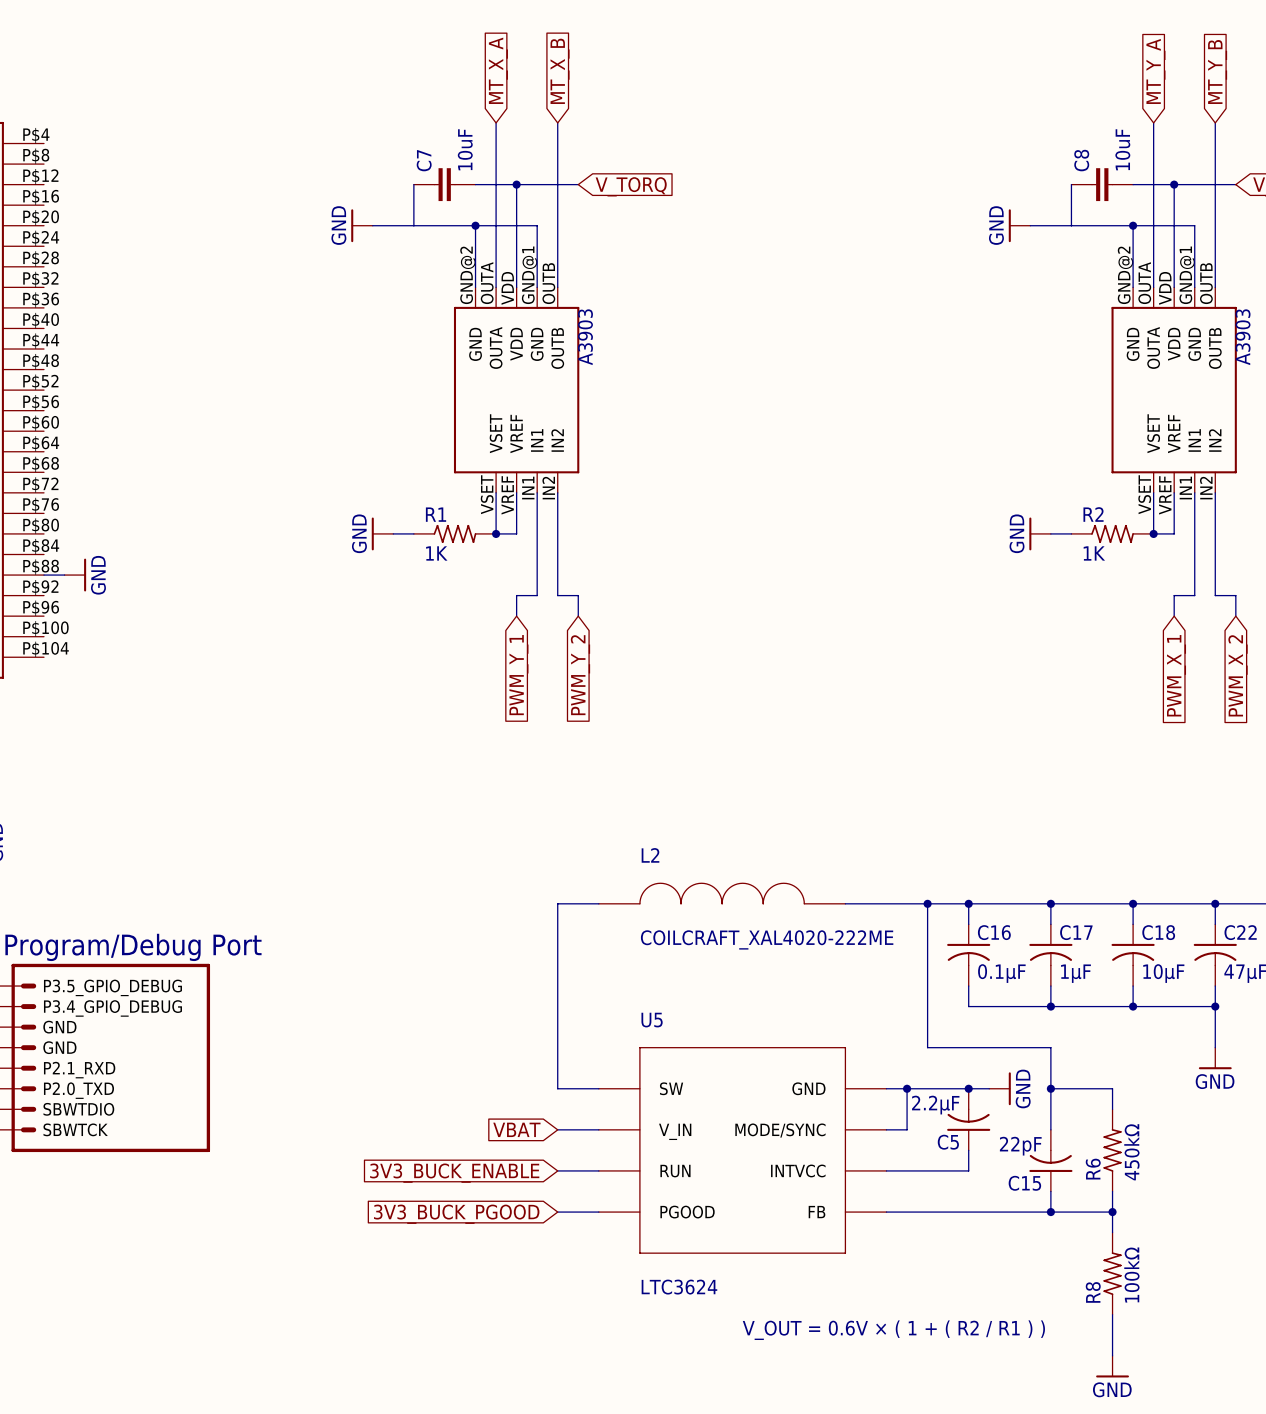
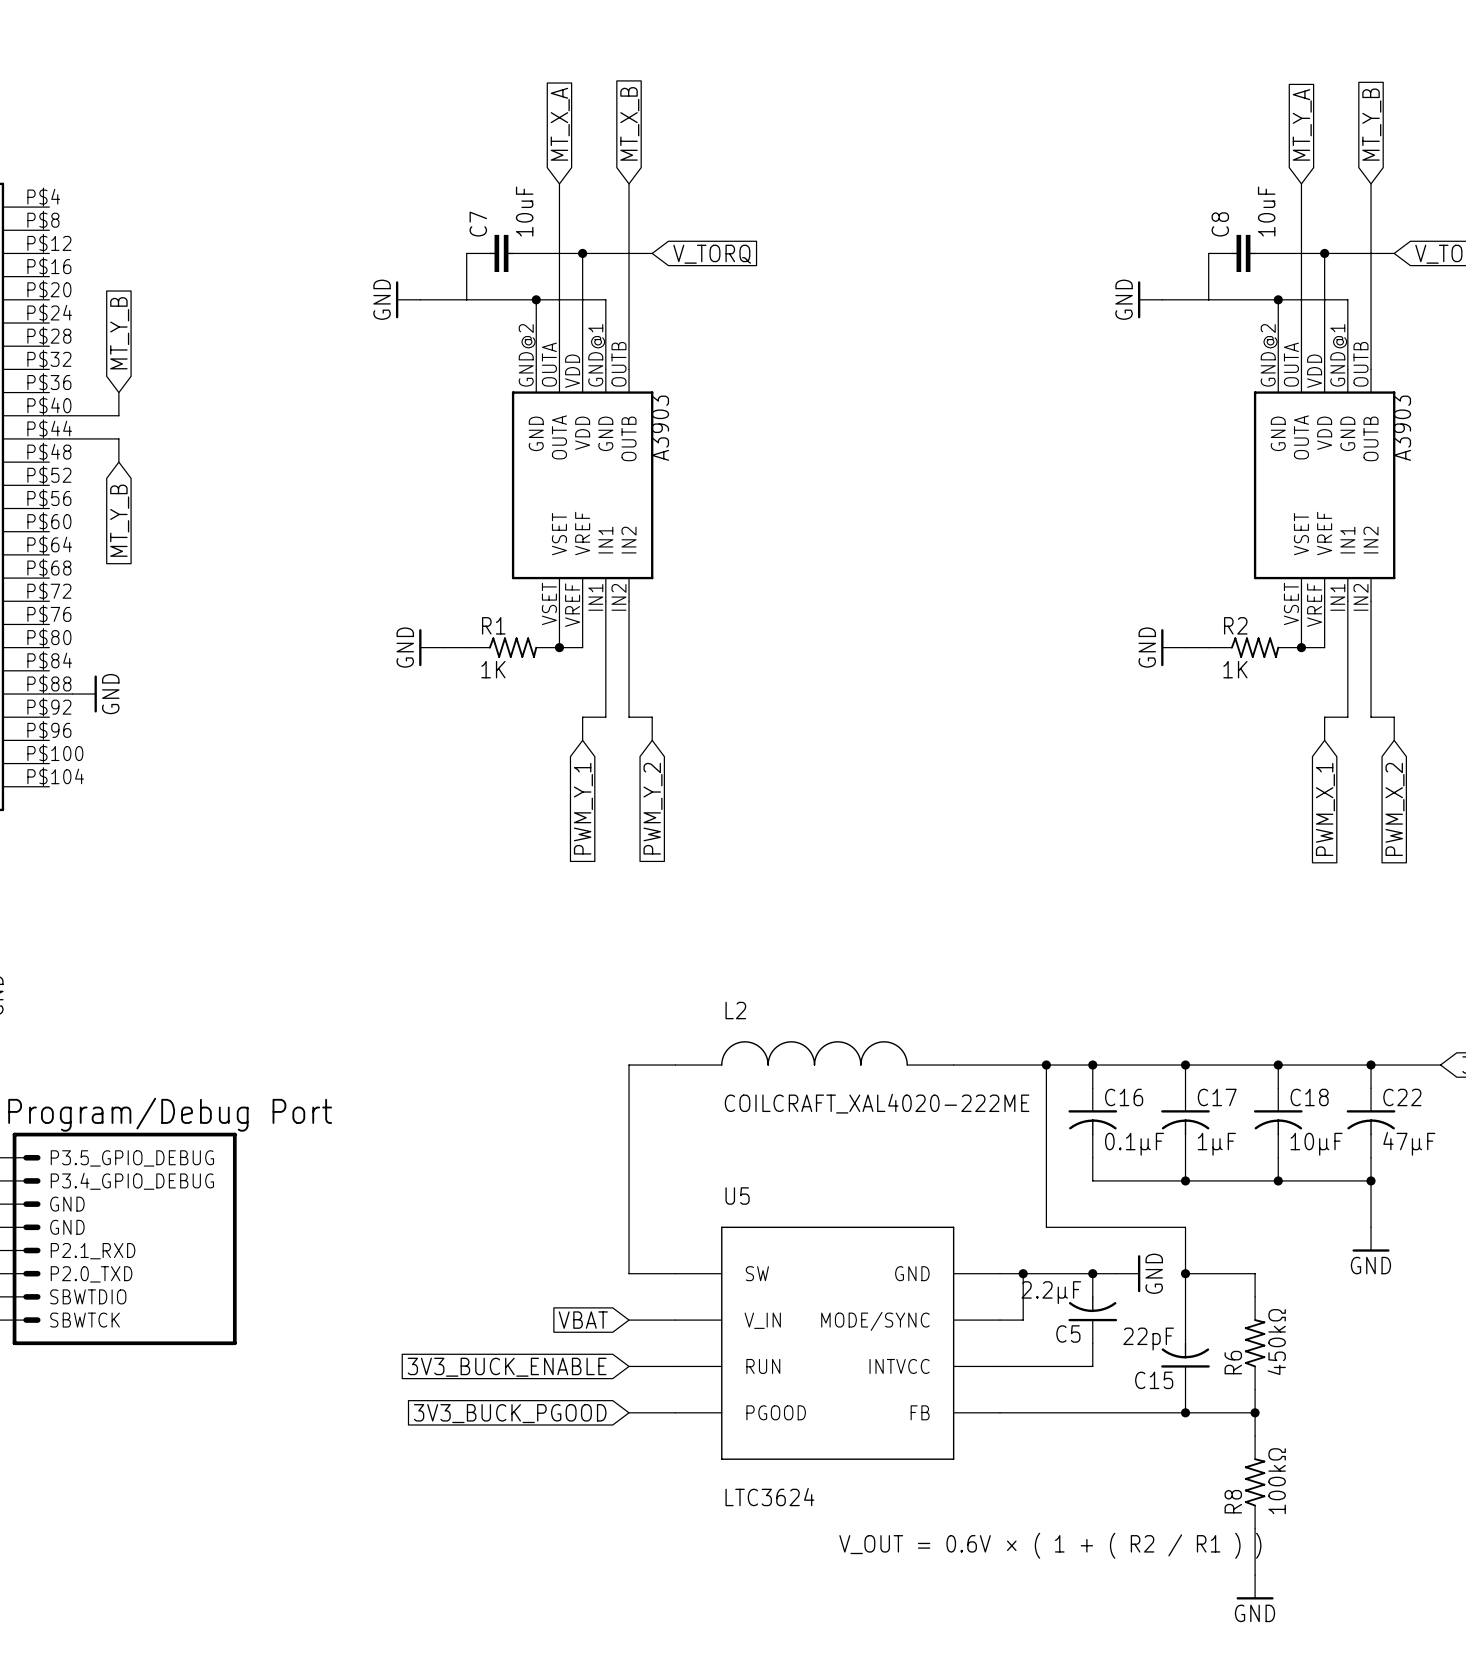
global label: none -> MT_Y_B (119, 333)
wire: none -> (118, 392) (118, 415) (49, 415)
wire: none -> (49, 438) (118, 438) (118, 462)
global label: none -> MT_Y_B (119, 520)

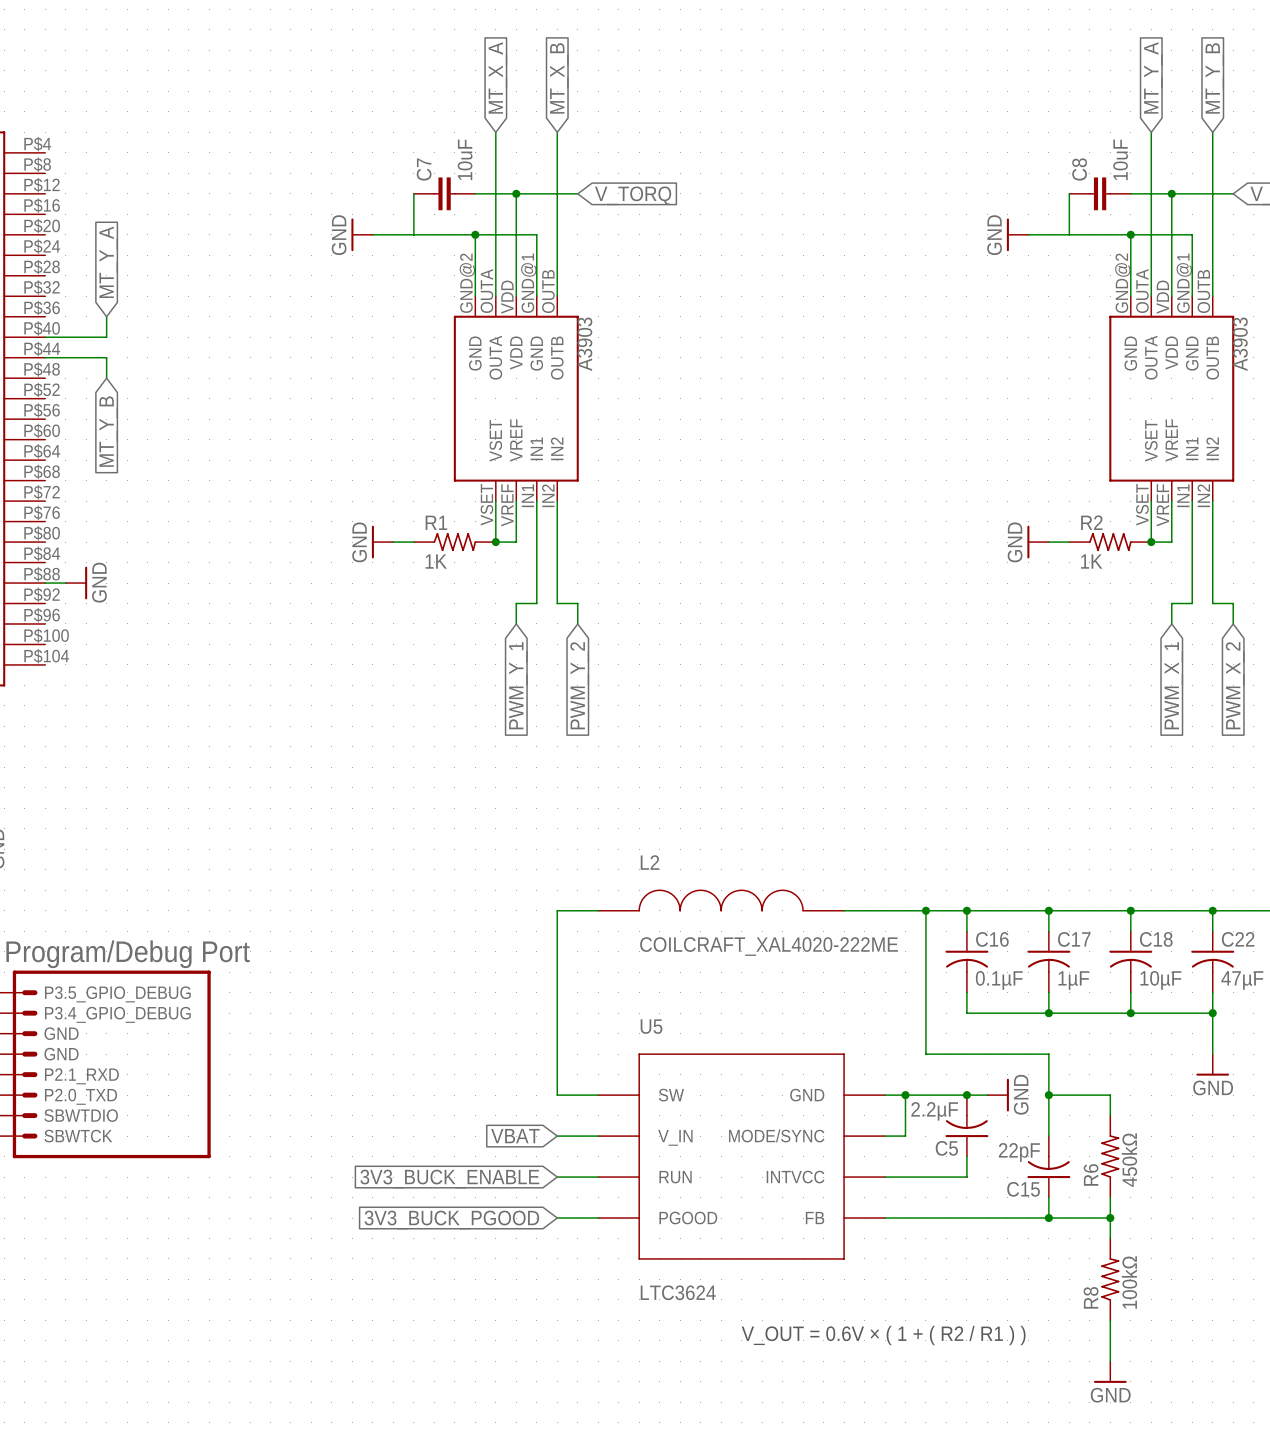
global label: MT_Y_B (119, 333) -> MT_Y_A (108, 262)

